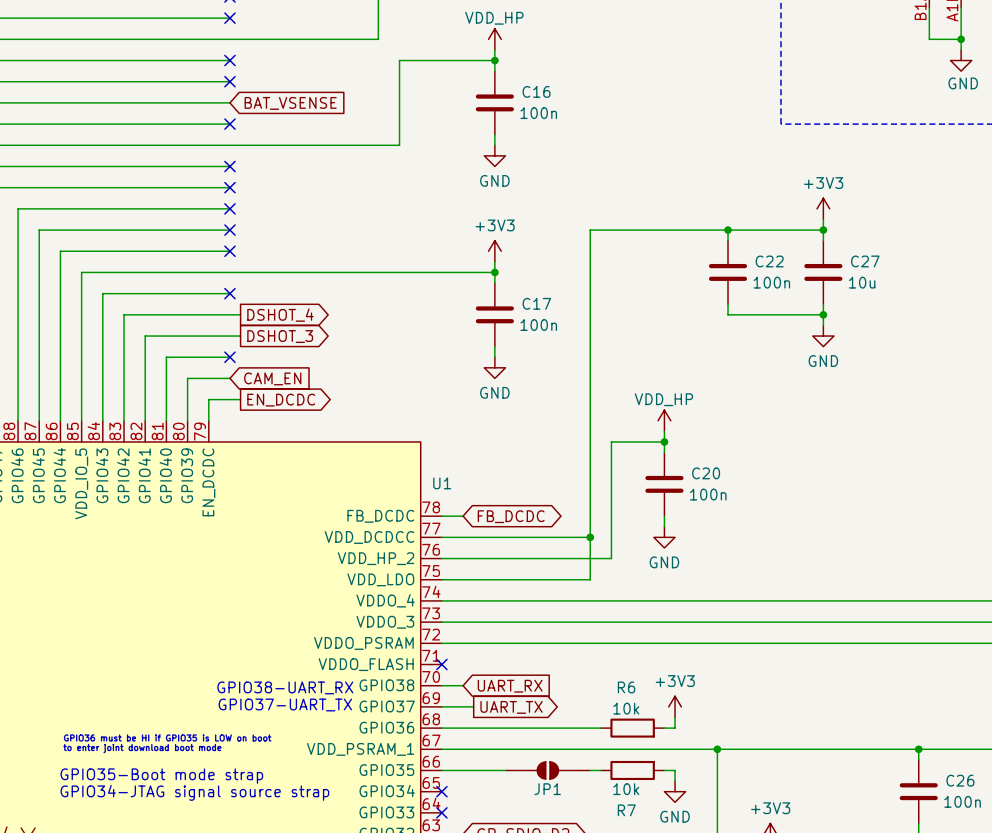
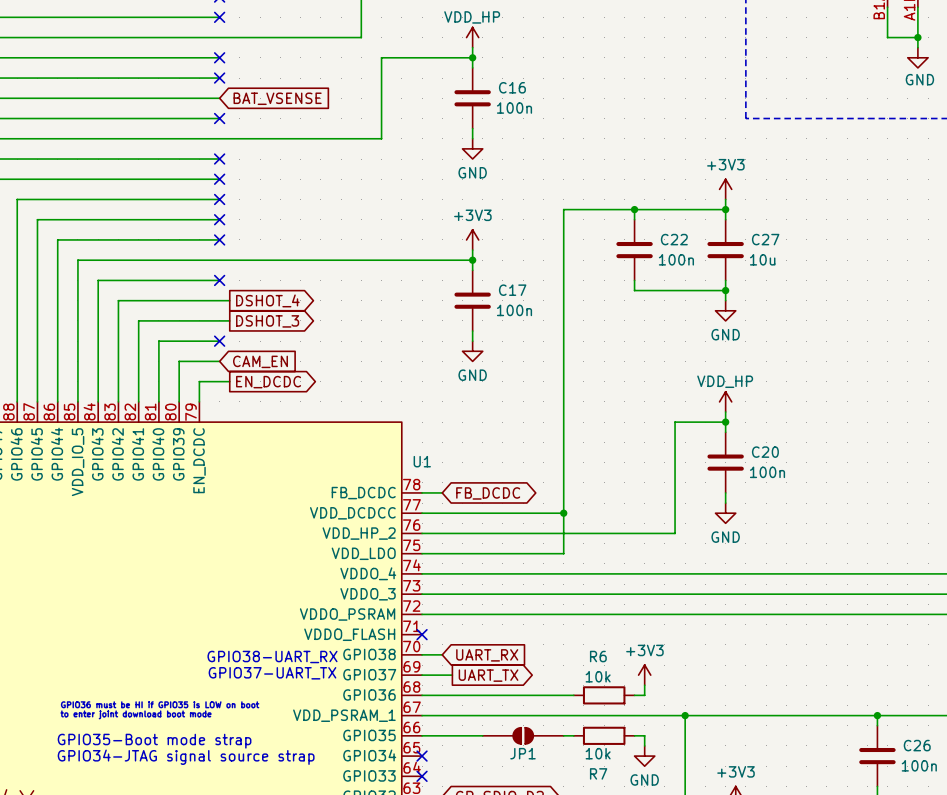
power symbol position: +3V3 (823, 208) -> +3V3 (725, 189)
junction: none -> (634, 209)
junction: none -> (725, 209)
wire: (823, 219) (823, 240) -> (725, 199) (725, 219)
wire: (590, 230) (823, 230) -> (563, 219) (563, 209) (725, 209)
wire: (728, 230) (728, 240) -> (634, 209) (634, 219)
junction: (728, 230) -> none
junction: (823, 230) -> none
C22 position: (728, 272) -> (634, 250)
C27 position: (823, 272) -> (725, 250)
wire: (728, 304) (728, 314) (823, 314) -> (634, 280) (634, 290) (725, 290)
junction: none -> (725, 290)
wire: (823, 304) (823, 325) -> (725, 280) (725, 300)
junction: (823, 314) -> none
power symbol position: GND (823, 336) -> GND (725, 310)
power symbol position: VDD_HP (664, 420) -> VDD_HP (725, 401)
wire: (664, 431) (664, 452) -> (725, 412) (725, 432)
wire: (664, 441) (611, 441) (611, 558) -> (725, 422) (675, 422) (675, 533) (583, 533)
junction: (664, 441) -> none
junction: none -> (725, 422)
C20 position: (664, 484) -> (725, 462)
wire: (664, 516) (664, 526) -> (725, 492) (725, 503)
power symbol position: GND (664, 537) -> GND (725, 513)

